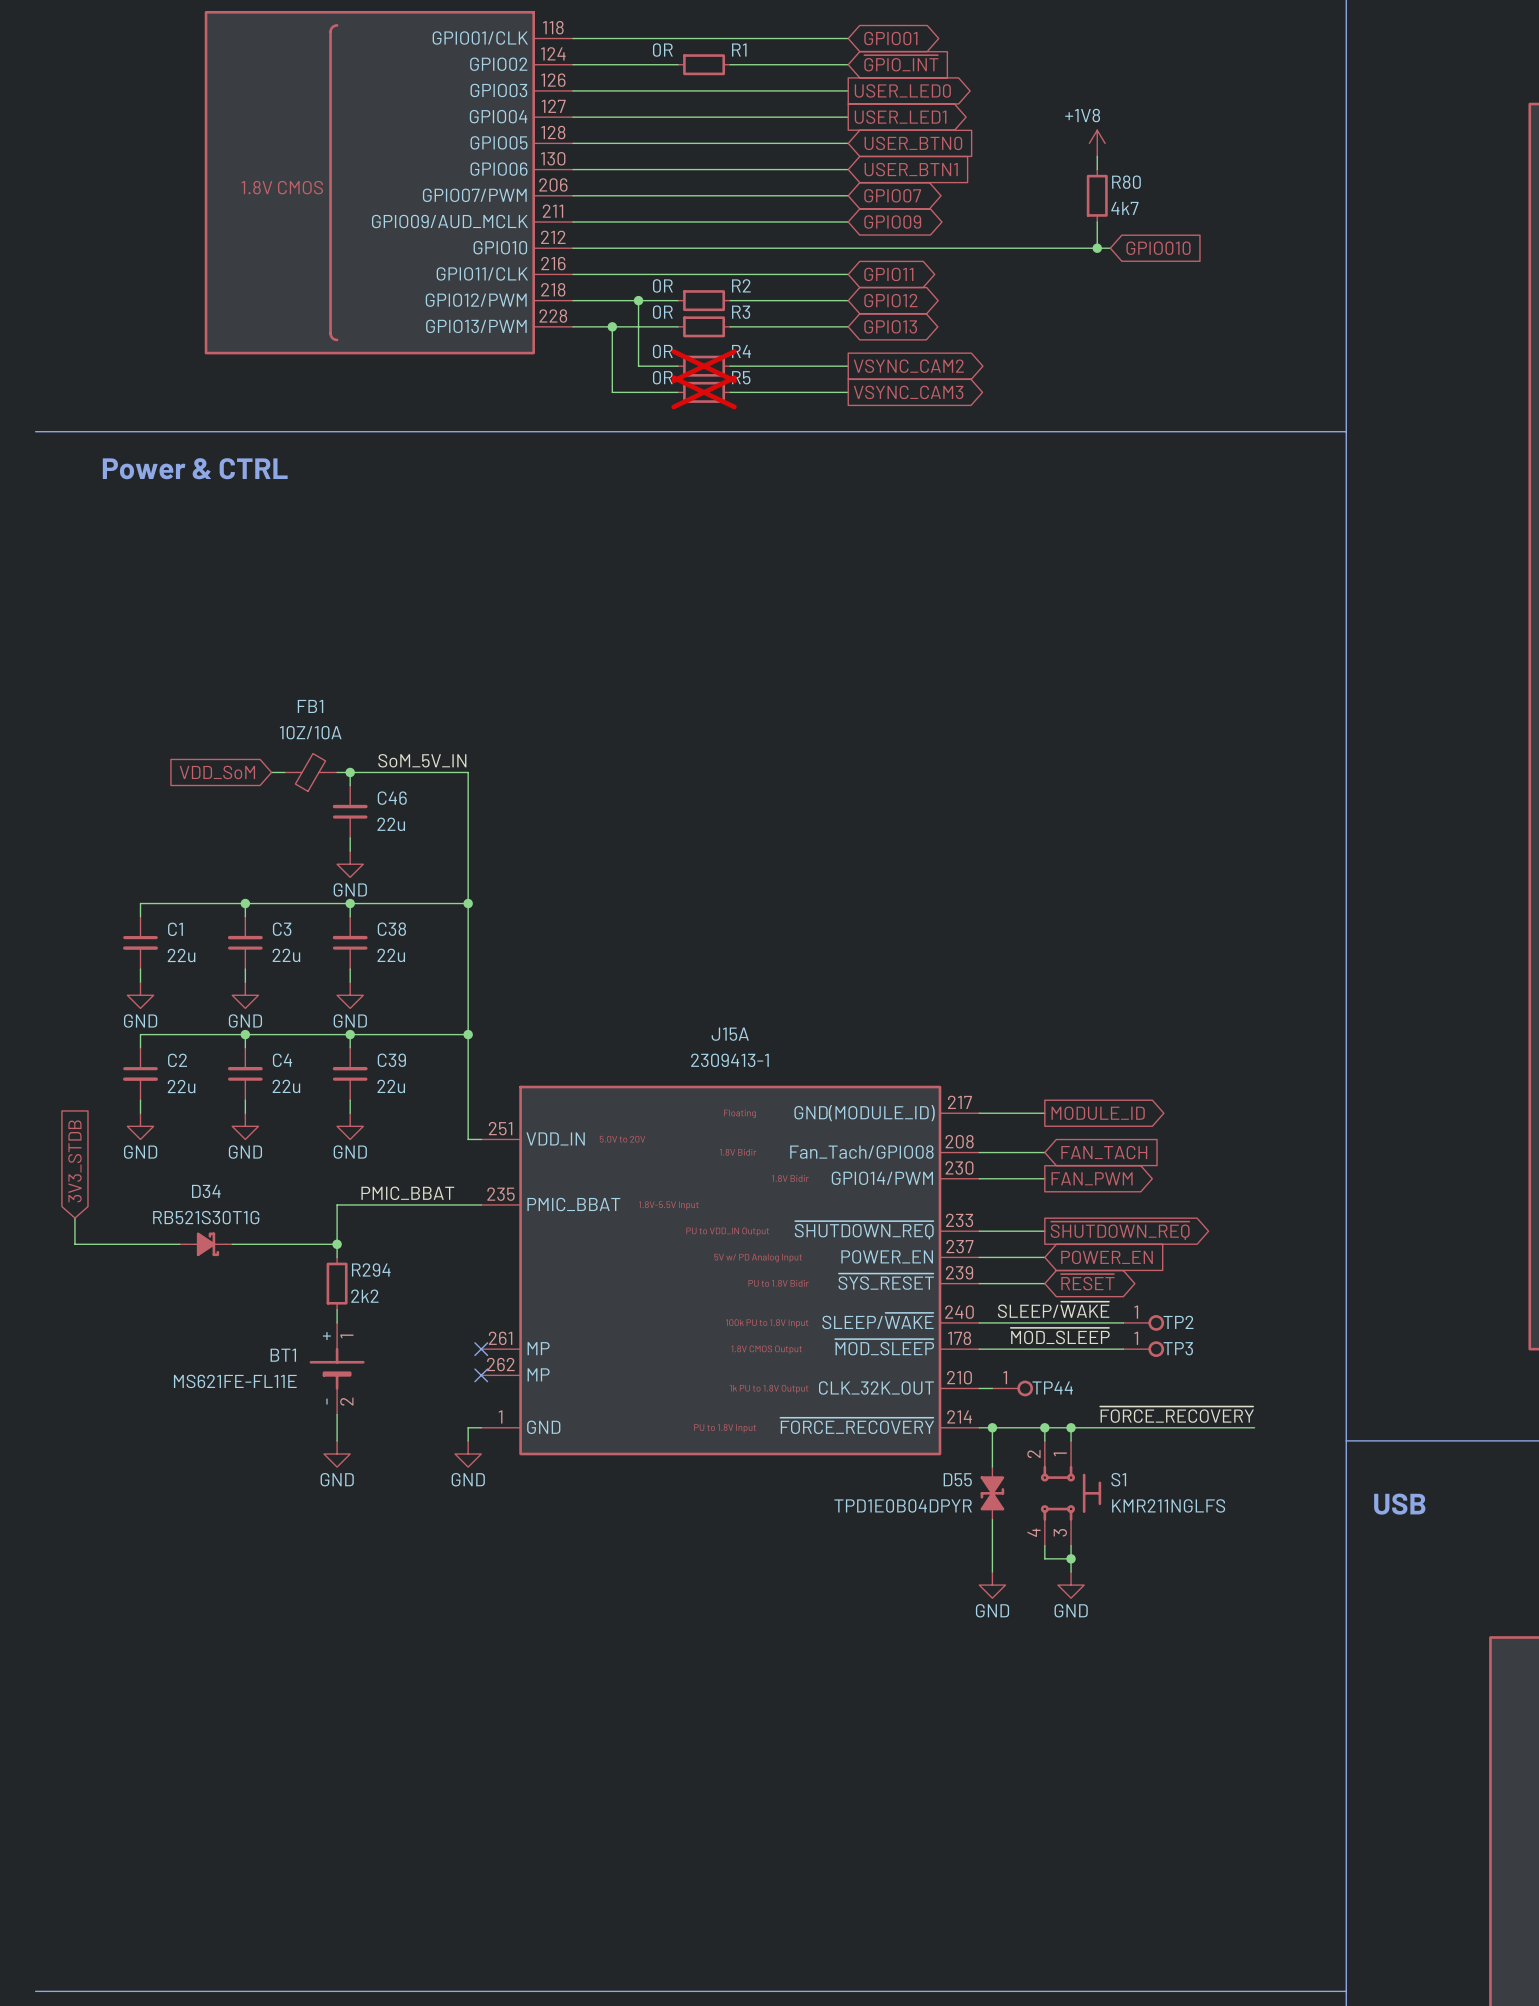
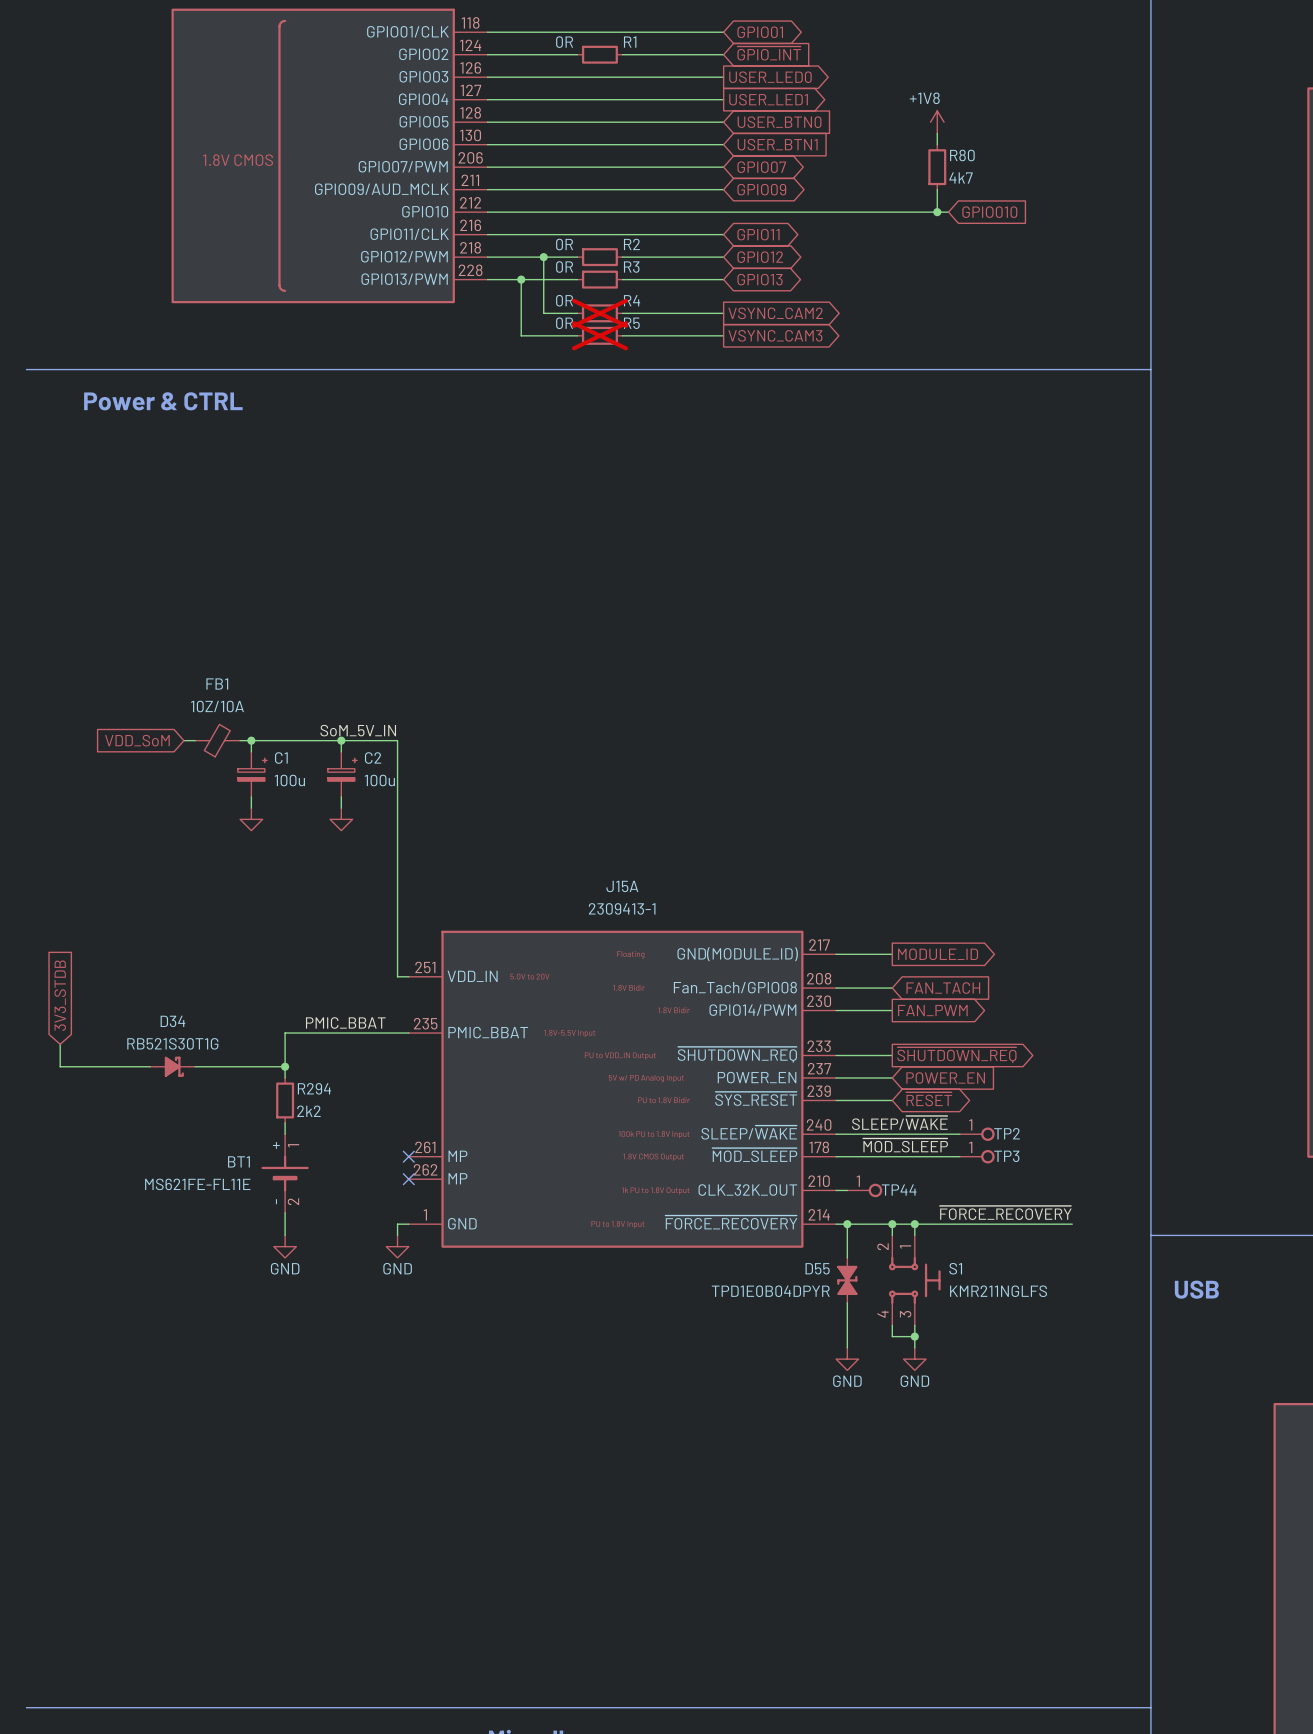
label position: SoM_5V_IN (422, 760) -> SoM_5V_IN (358, 730)
global label position: VDD_SoM (217, 772) -> VDD_SoM (137, 740)
wire: (271, 772) (284, 772) -> (183, 740) (195, 740)
FB1 position: (310, 772) -> (217, 740)
wire: (337, 772) (468, 772) (468, 864) -> (240, 740) (397, 740)
wire: (350, 772) (350, 785) -> none
junction: (350, 772) -> none
C46: (350, 811) -> none
wire: (350, 838) (350, 851) -> none
junction: none -> (251, 740)
power symbol: GND (350, 864) -> none
junction: none -> (341, 740)
wire: (245, 903) (245, 916) -> (251, 740) (251, 751)
junction: (245, 903) -> none
wire: (350, 903) (350, 916) -> (341, 740) (341, 751)
junction: (350, 903) -> none
wire: (468, 903) (140, 903) (140, 916) -> none
junction: (468, 903) -> none
C1 symbol: [123, 916, 158, 970] -> [237, 751, 268, 797]
C3: (245, 942) -> none
C38: (350, 942) -> none
C1 text: 22u (181, 955) -> 100u (289, 780)
power symbol: none -> (251, 819)
power symbol: none -> (341, 819)
wire: (140, 969) (140, 982) -> none
wire: (245, 969) (245, 982) -> (251, 796) (251, 808)
wire: (350, 969) (350, 982) -> (341, 796) (341, 808)
power symbol: GND (140, 995) -> none
power symbol: GND (245, 995) -> none
power symbol: GND (350, 995) -> none
wire: (245, 1034) (245, 1047) -> none
junction: (245, 1034) -> none
wire: (350, 1034) (350, 1047) -> none
junction: (350, 1034) -> none
wire: (468, 1034) (140, 1034) (140, 1047) -> none
junction: (468, 1034) -> none
C2 symbol: [123, 1047, 158, 1101] -> [327, 751, 358, 797]
C4: (245, 1073) -> none
C39: (350, 1073) -> none
C2 text: 22u (181, 1086) -> 100u (379, 780)
wire: (140, 1100) (140, 1113) -> none
wire: (245, 1100) (245, 1113) -> none
wire: (350, 1100) (350, 1113) -> none
power symbol: GND (140, 1126) -> none
power symbol: GND (245, 1126) -> none
power symbol: GND (350, 1126) -> none

